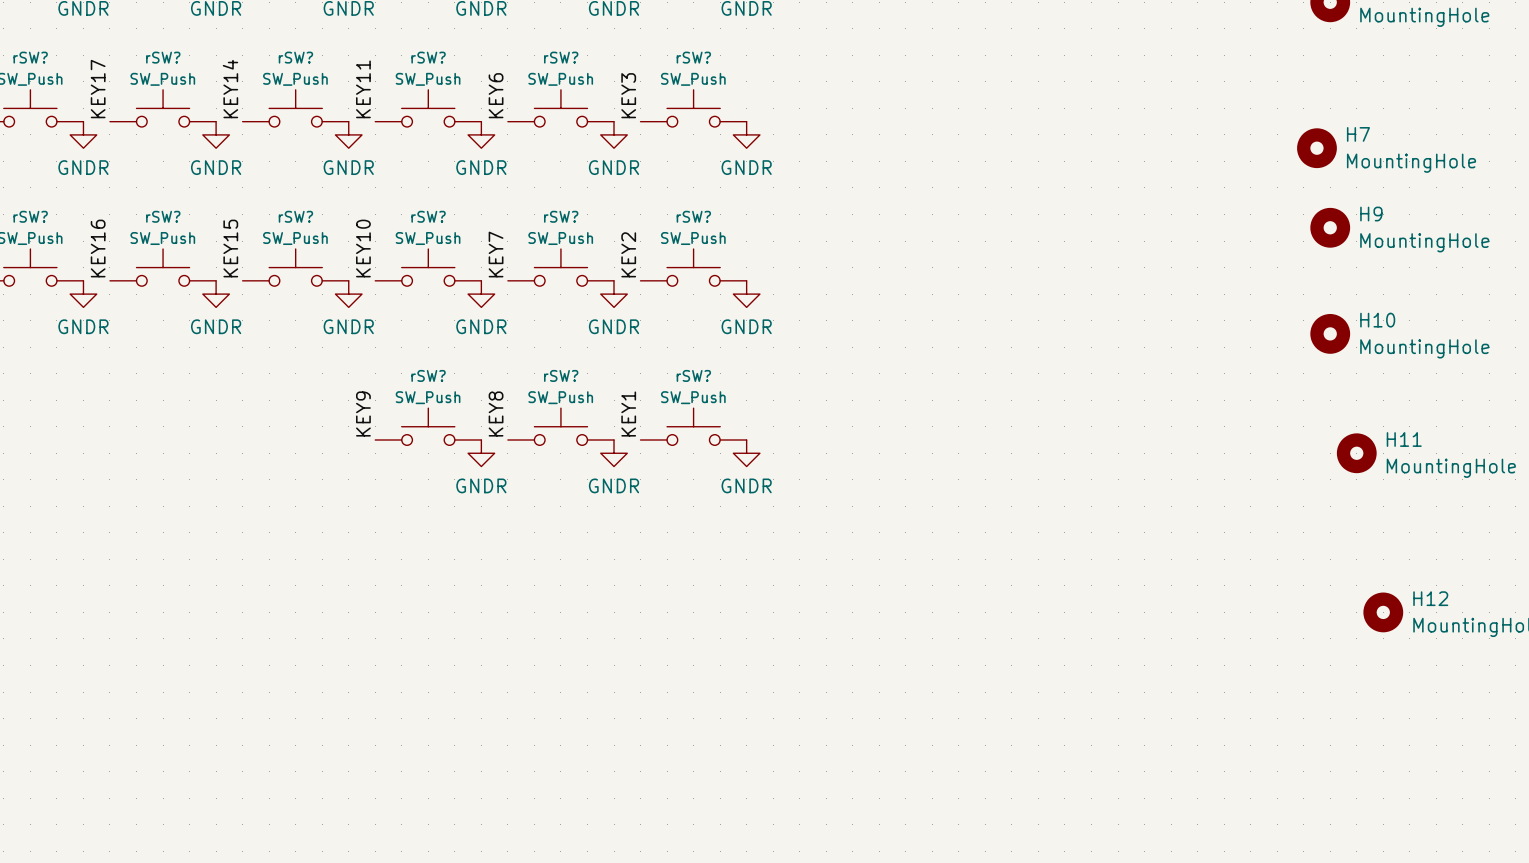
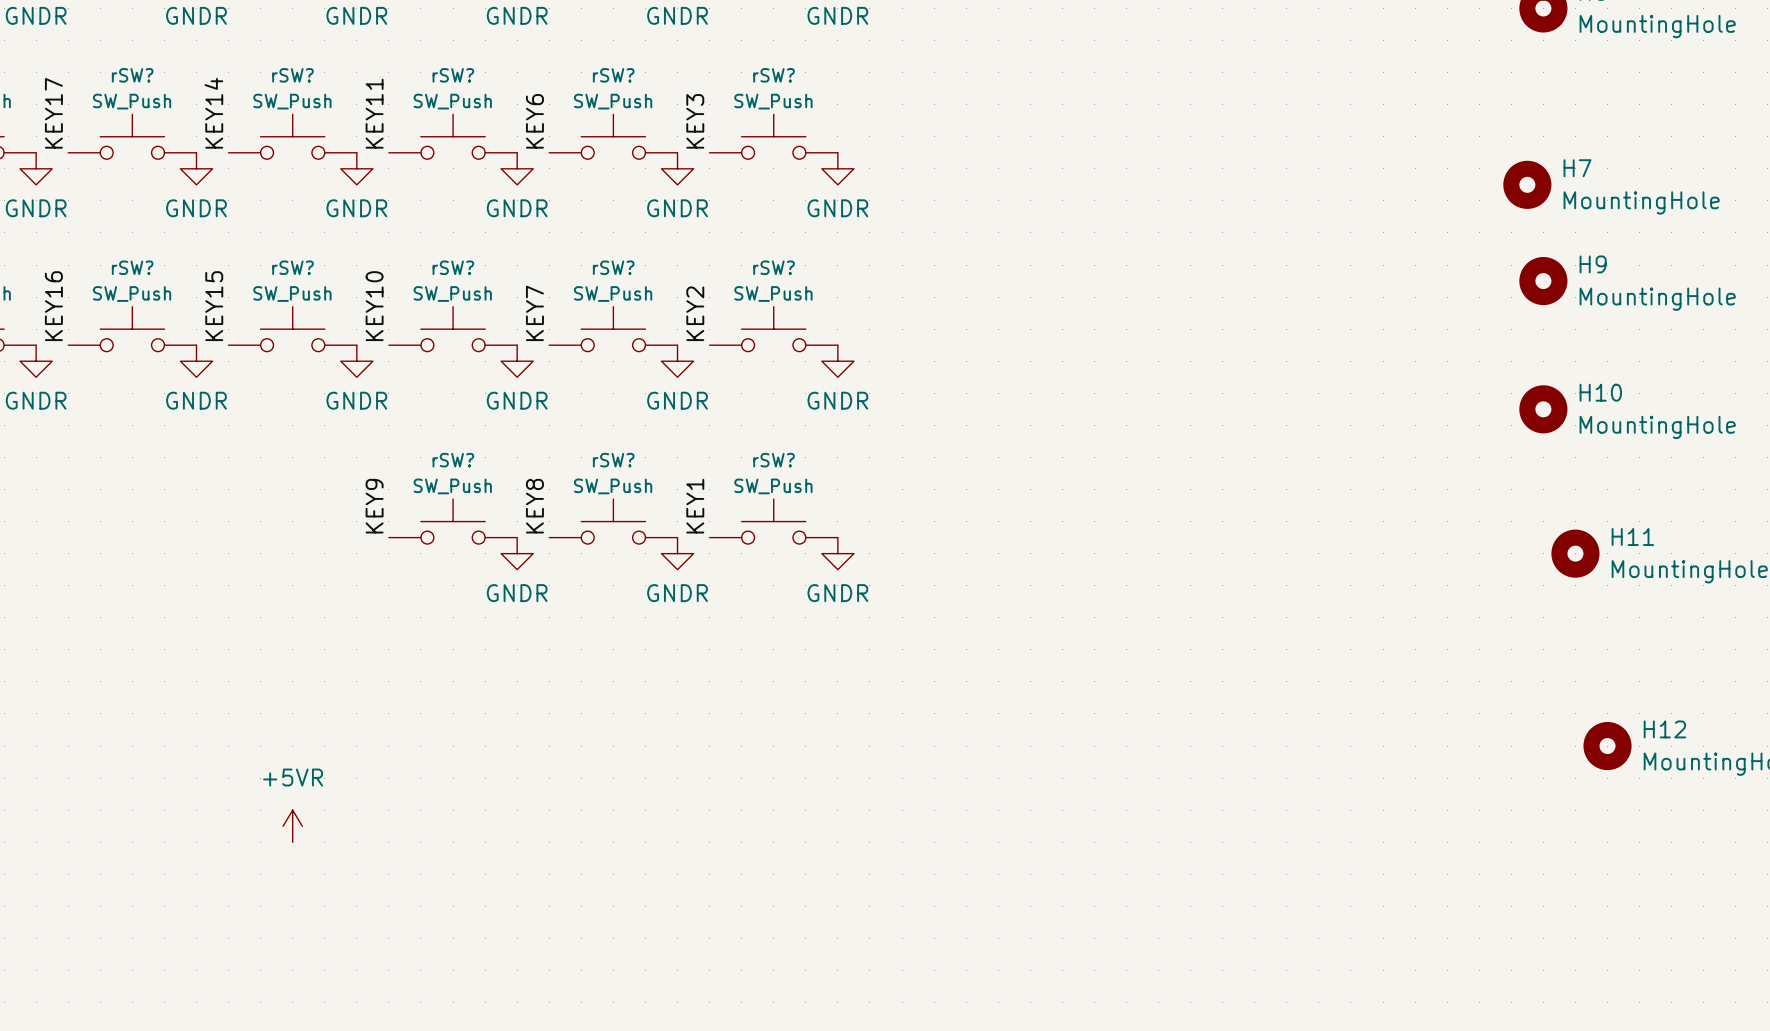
power symbol: none -> +5VR (292, 826)

